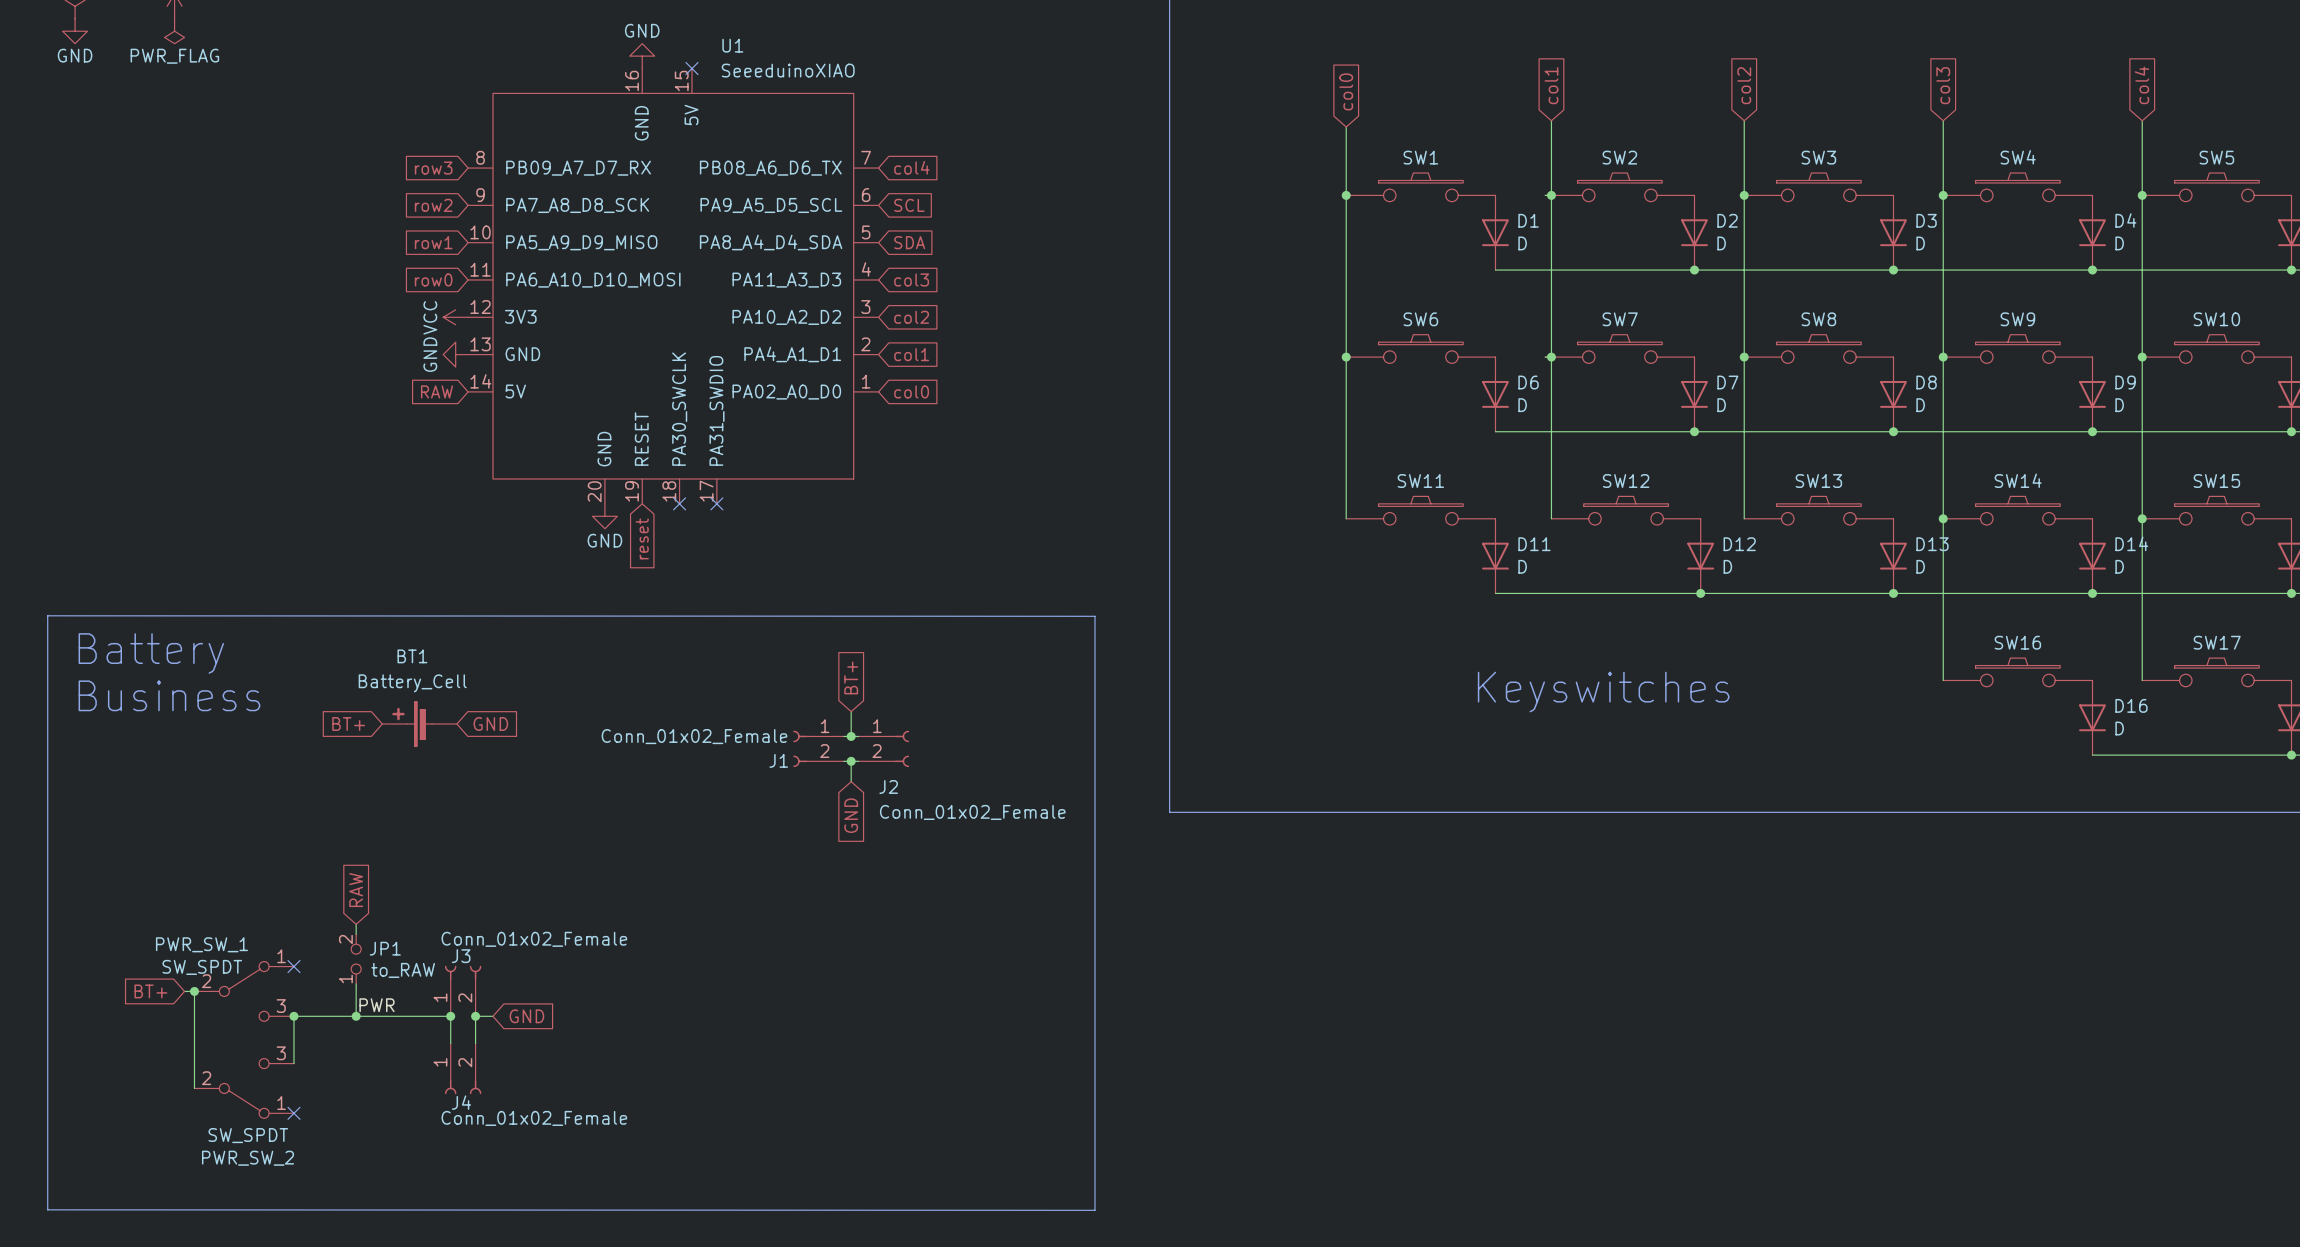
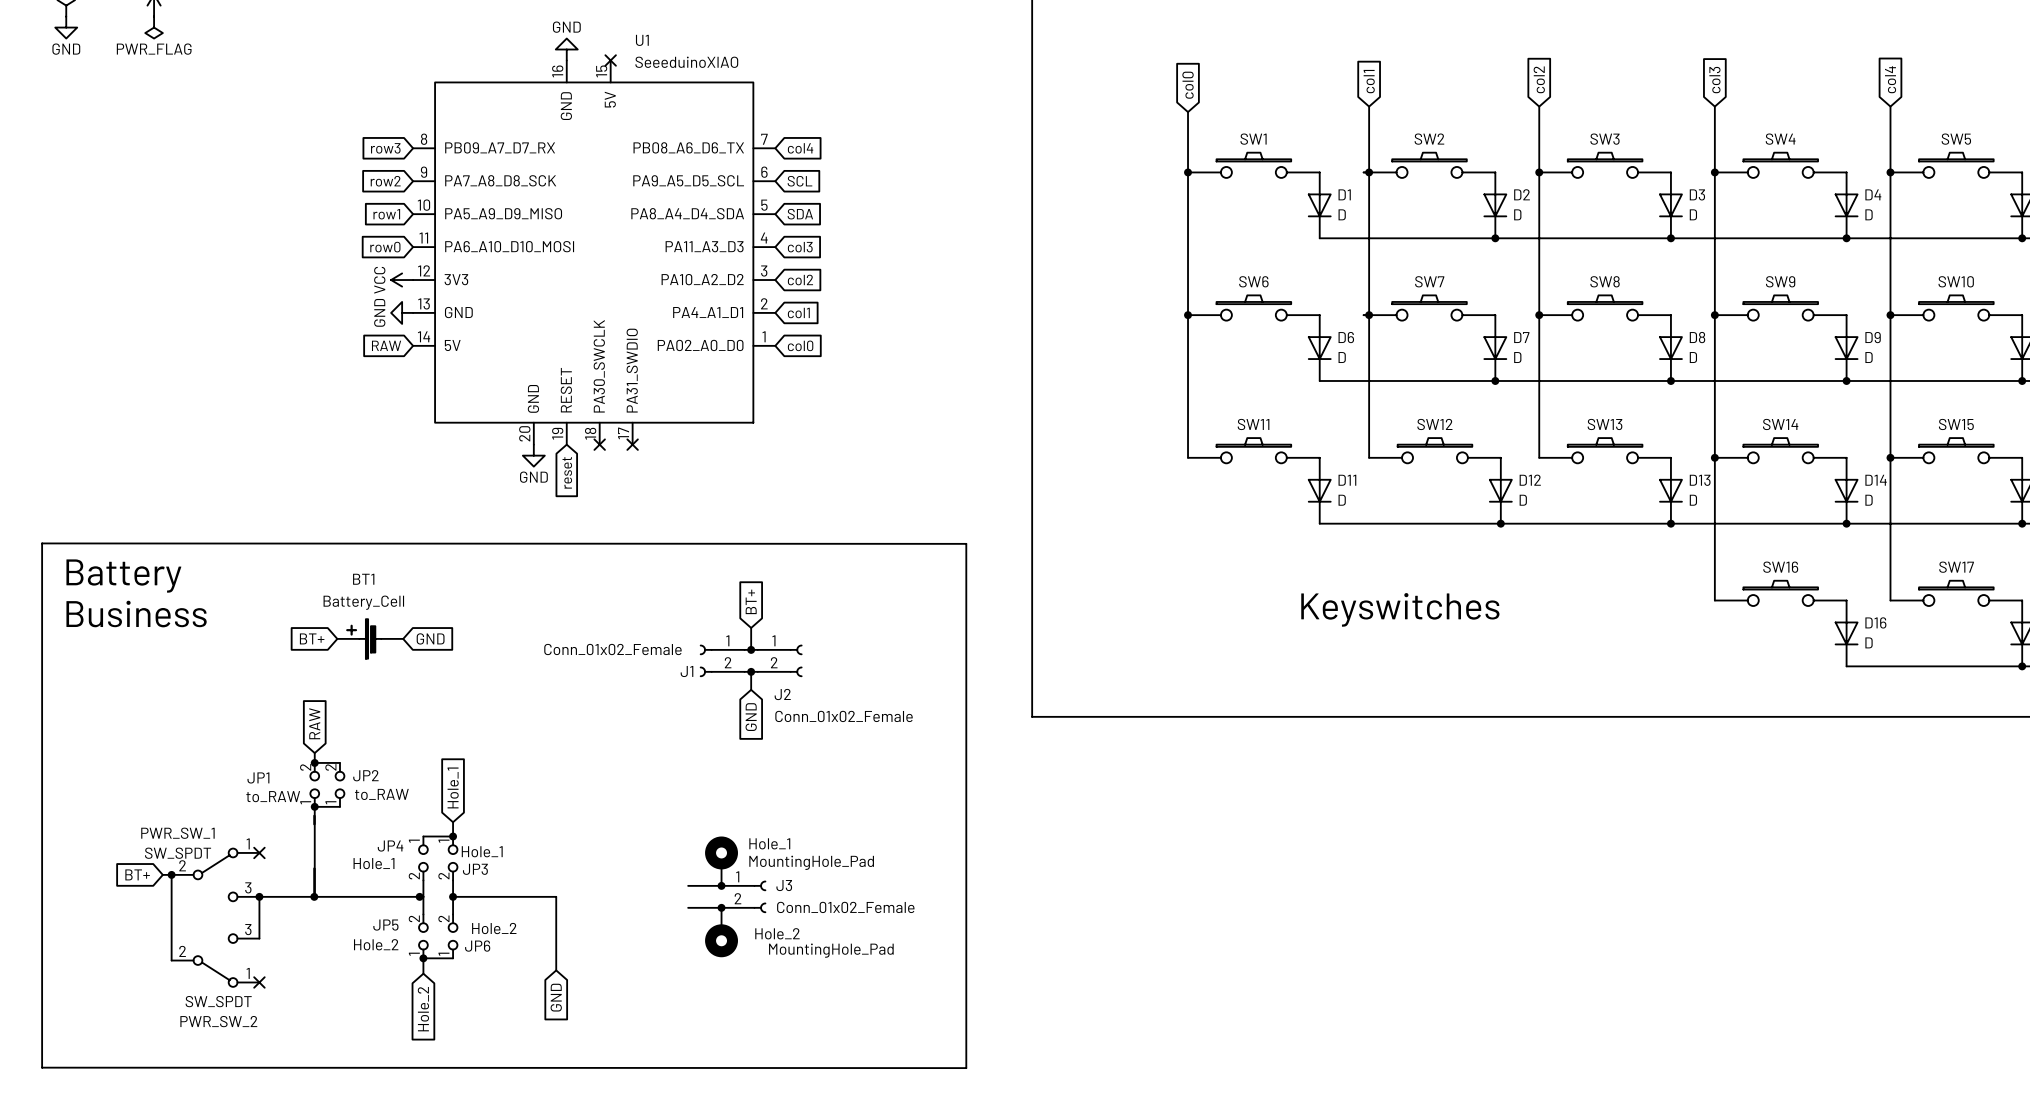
wire: none -> (314, 753) (314, 762) (339, 762)
junction: none -> (314, 762)
global label: none -> Hole_1 (453, 787)
JP2: none -> to_RAW (339, 784)
global label position: RAW (356, 890) -> RAW (314, 723)
junction: none -> (314, 806)
wire: none -> (339, 806) (314, 806) (314, 896)
wire: none -> (453, 822) (453, 836) (423, 836)
J3 value position: Conn_01x02_Female (534, 939) -> Conn_01x02_Female (845, 907)
junction: none -> (453, 836)
JP1 name position: JP1 (385, 948) -> JP1 (258, 777)
JP1 position: (356, 959) -> (314, 784)
JP1 value position: to_RAW (403, 970) -> to_RAW (273, 796)
J3 rotation: 0° (463, 972) -> 90° clockwise (759, 896)
JP4: none -> Hole_1 (423, 858)
JP3: none -> Hole_1 (453, 858)
Hole_1: none -> MountingHole_Pad (721, 861)
J3 position: (463, 991) -> (743, 896)
wire: none -> (423, 880) (423, 914)
wire: none -> (453, 880) (453, 914)
wire: none -> (688, 885) (721, 885)
junction: none -> (721, 885)
label: PWR (376, 1005) -> none
wire: (450, 1016) (450, 1043) -> (397, 896) (419, 896)
junction: (450, 1016) -> none
wire: (475, 1016) (475, 1043) -> none
wire: (479, 1016) (492, 1016) -> none
wire: none -> (453, 896) (556, 896) (556, 970)
junction: none -> (453, 896)
global label rotation: 0° (526, 1016) -> 90° clockwise (556, 997)
global label position: GND (526, 1016) -> GND (556, 997)
wire: none -> (688, 907) (721, 907)
junction: none -> (721, 907)
Hole_2: none -> MountingHole_Pad (721, 932)
JP5: none -> Hole_2 (423, 936)
JP6: none -> Hole_2 (453, 936)
J4: Conn_01x02_Female (463, 1068) -> none
junction: none -> (423, 958)
wire: none -> (453, 958) (423, 958) (423, 973)
global label: none -> Hole_2 (423, 1009)

